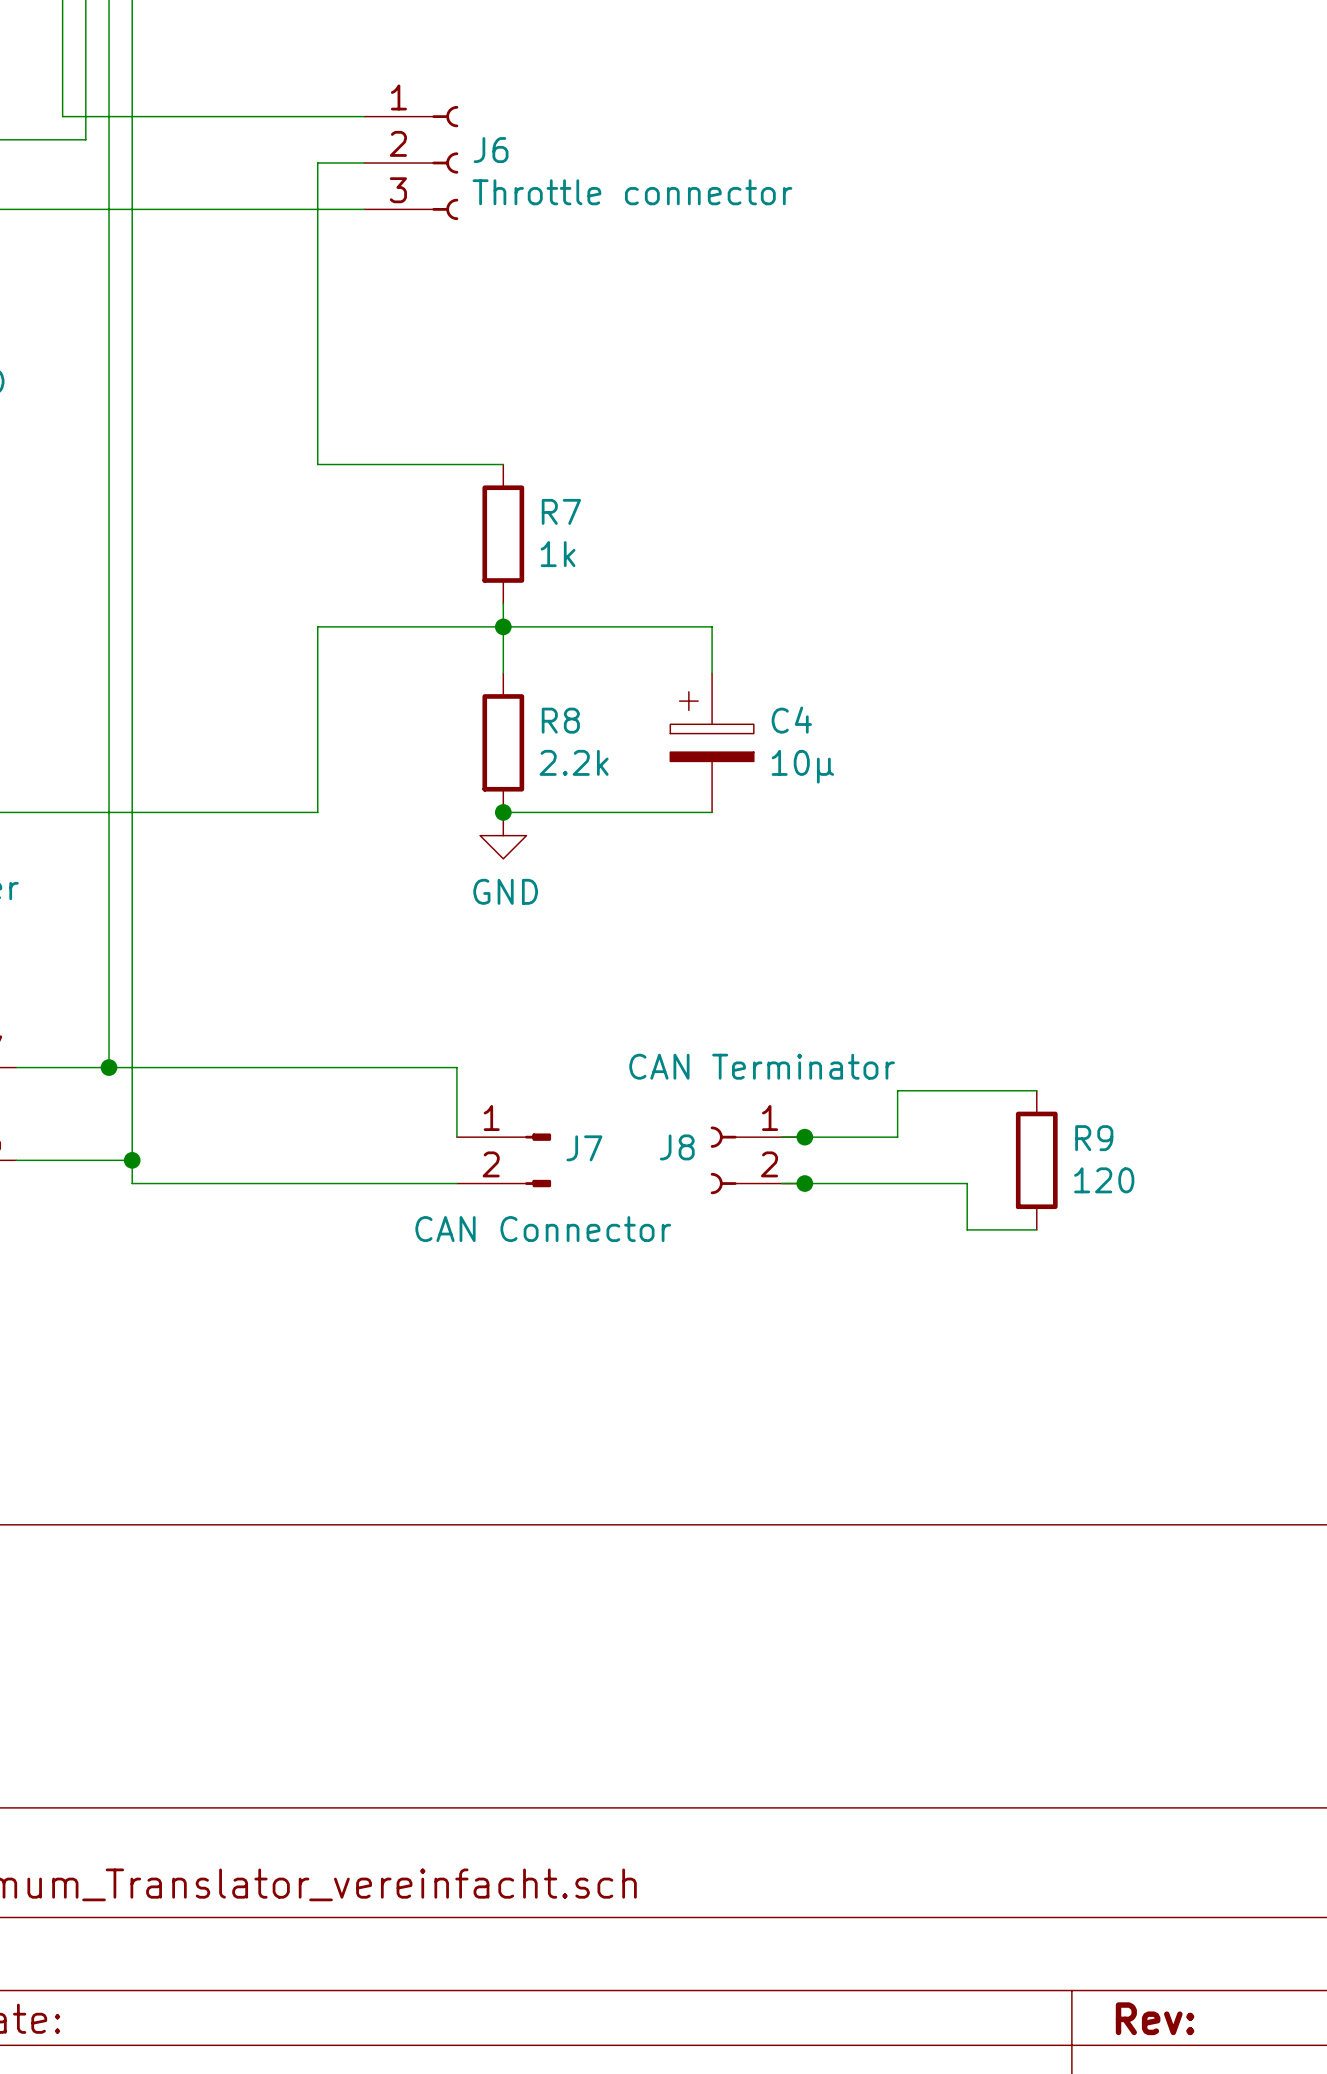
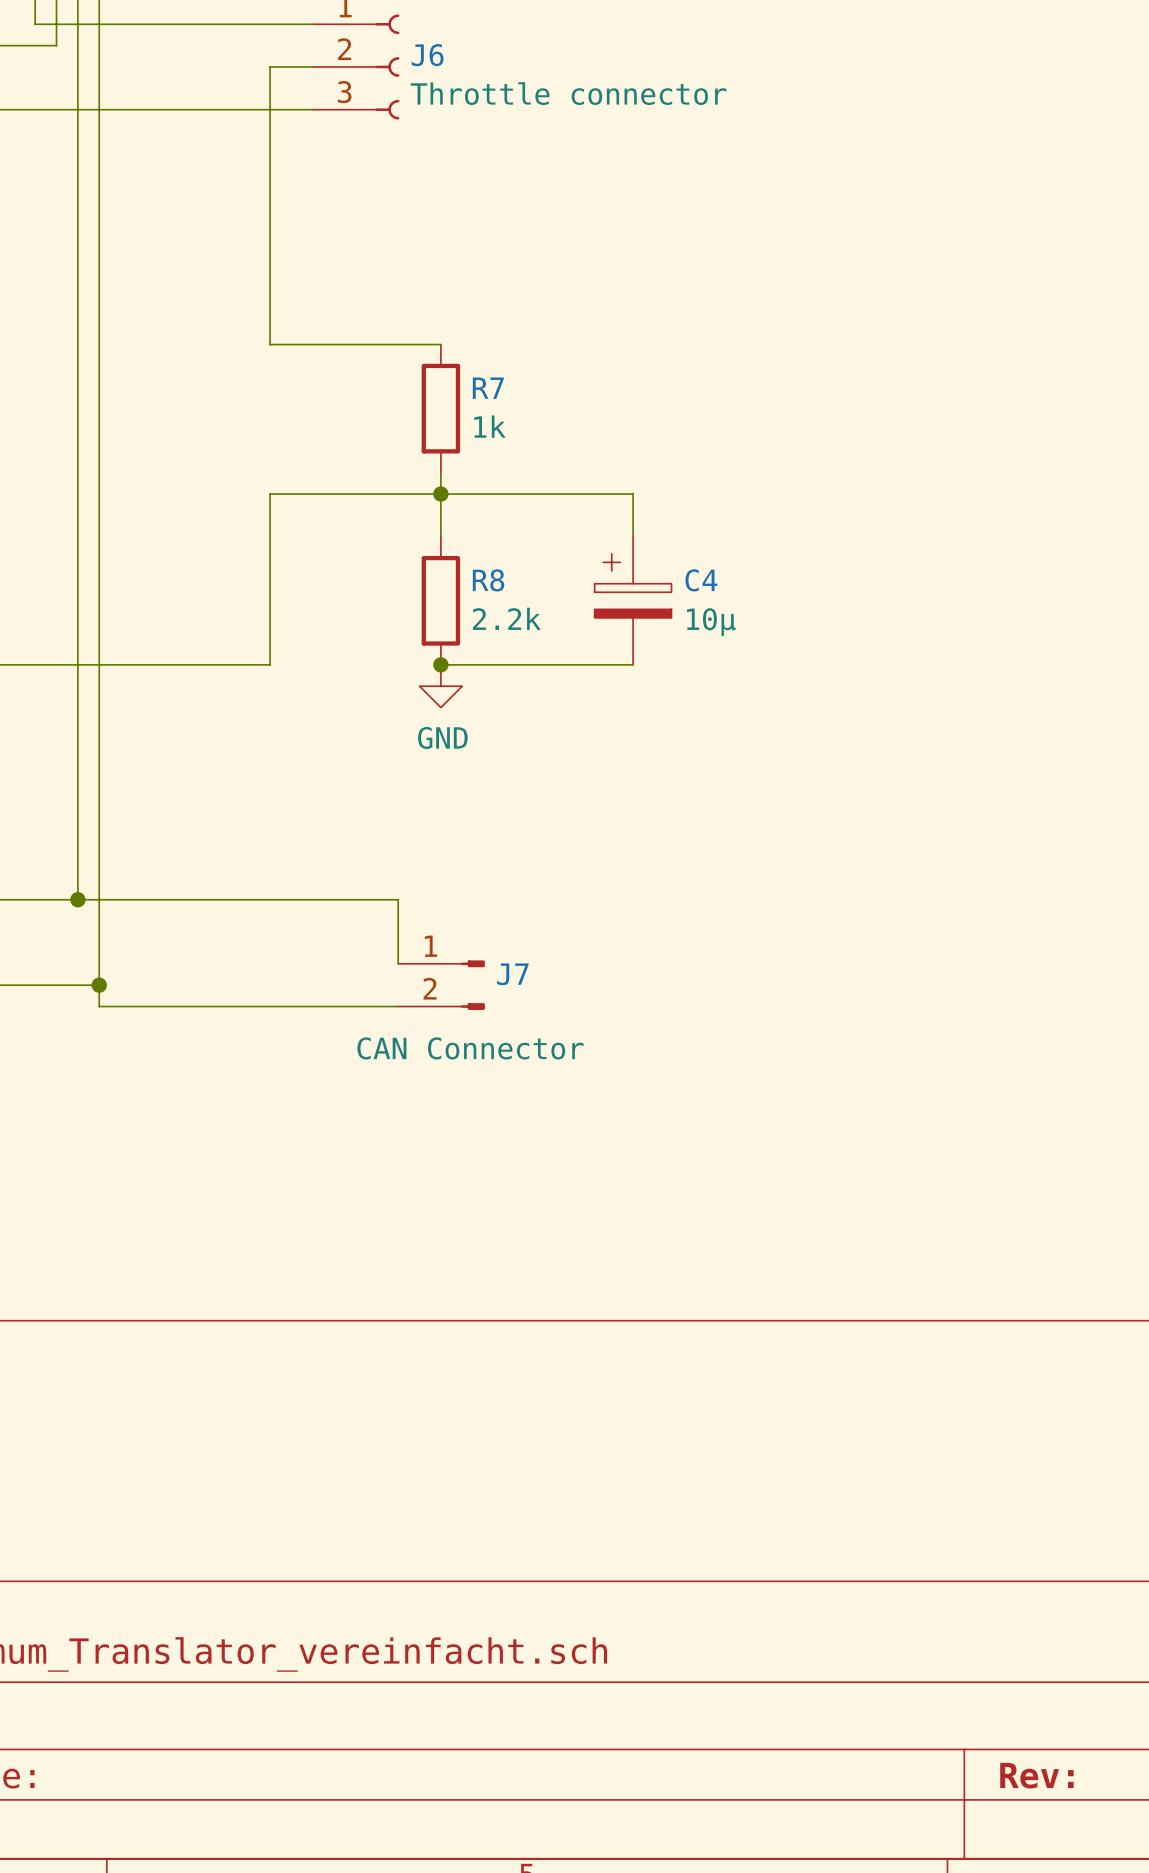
wire: (1036, 1090) (897, 1090) (897, 1137) (781, 1137) -> none
junction: (804, 1137) -> none
J8: CAN Terminator (757, 1160) -> none
R9: 120 (1036, 1160) -> none
wire: (781, 1183) (967, 1183) (967, 1229) (1036, 1229) -> none
junction: (804, 1183) -> none

